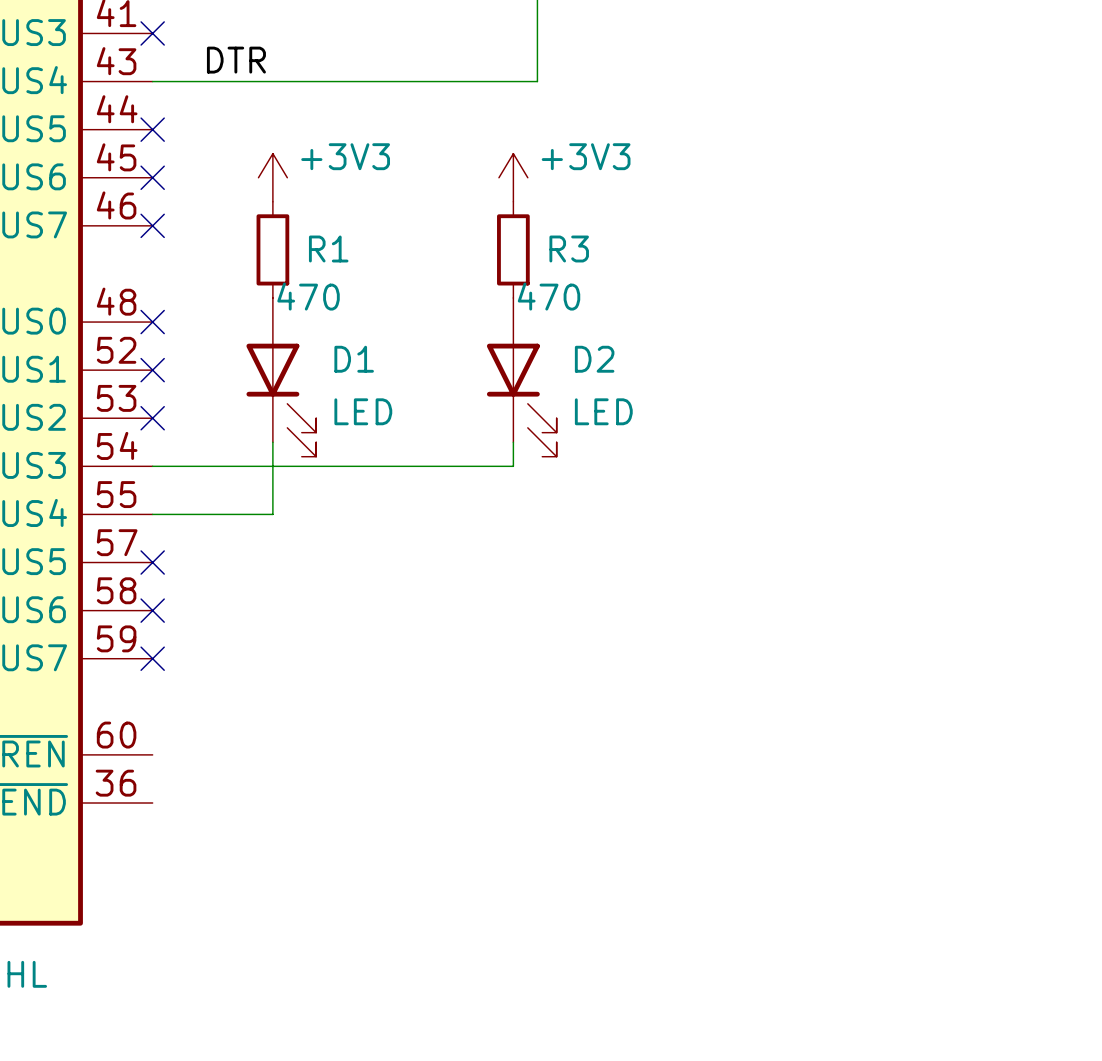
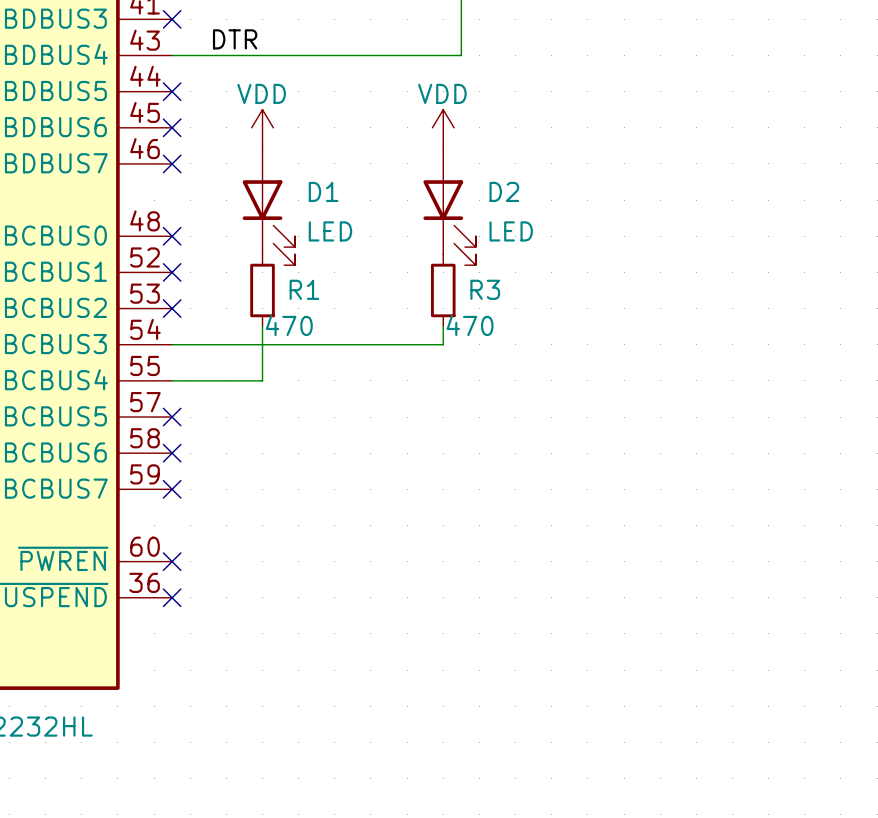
power symbol: +3V3 (272, 177) -> VDD (262, 127)
power symbol: +3V3 (513, 177) -> VDD (443, 127)
R1 position: (272, 249) -> (262, 290)
R3 position: (513, 249) -> (443, 290)
D1 position: (281, 377) -> (268, 205)
D2 position: (521, 377) -> (449, 205)
no-connect mark: none -> (172, 561)
no-connect mark: none -> (172, 597)

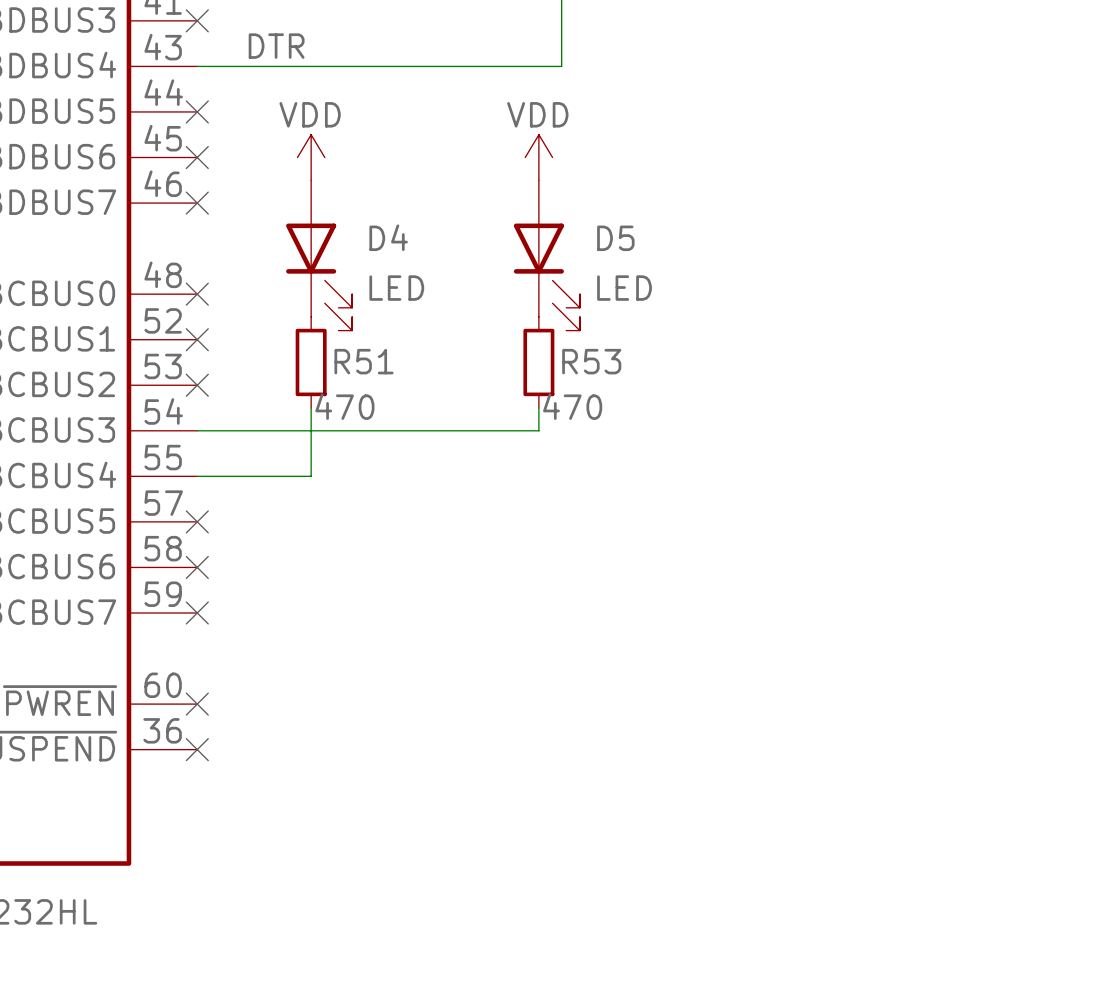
D1 name: D1 (323, 191) -> D4 (388, 237)
D2 name: D2 (504, 191) -> D5 (615, 238)
R1 name: R1 (304, 289) -> R51 (364, 361)
R3 name: R3 (485, 289) -> R53 (591, 361)

